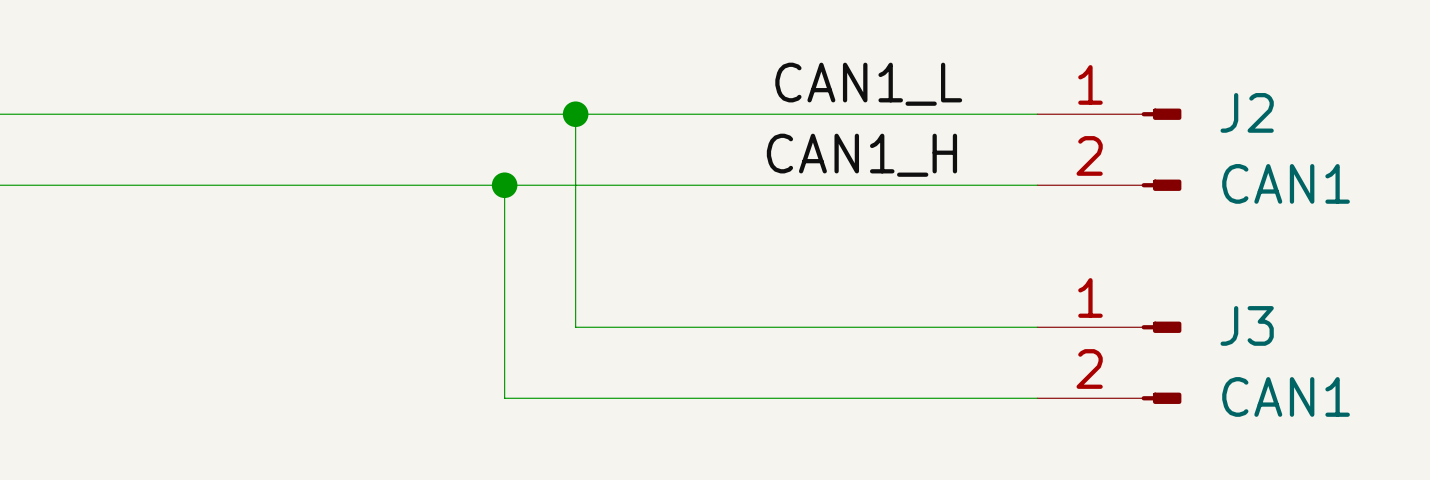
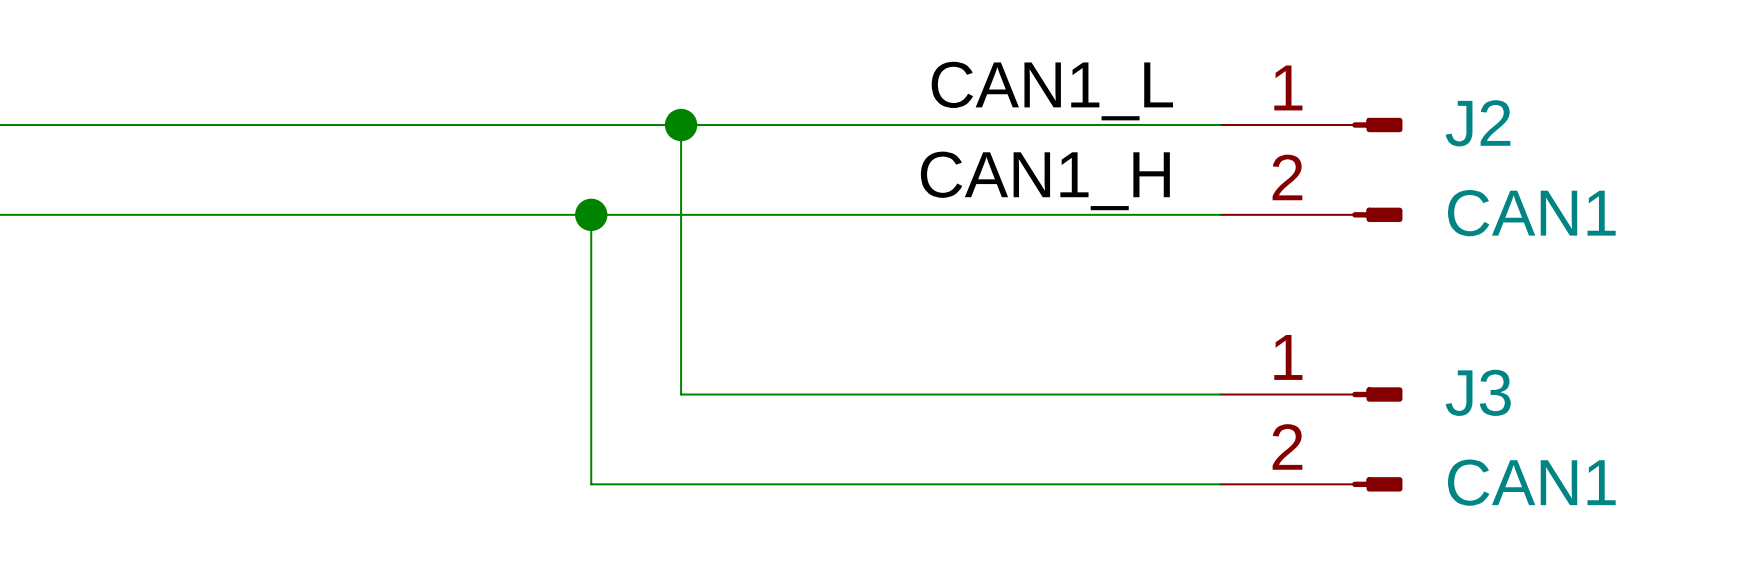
J2 position: (1109, 149) -> (1311, 169)
J3 position: (1109, 362) -> (1311, 439)

